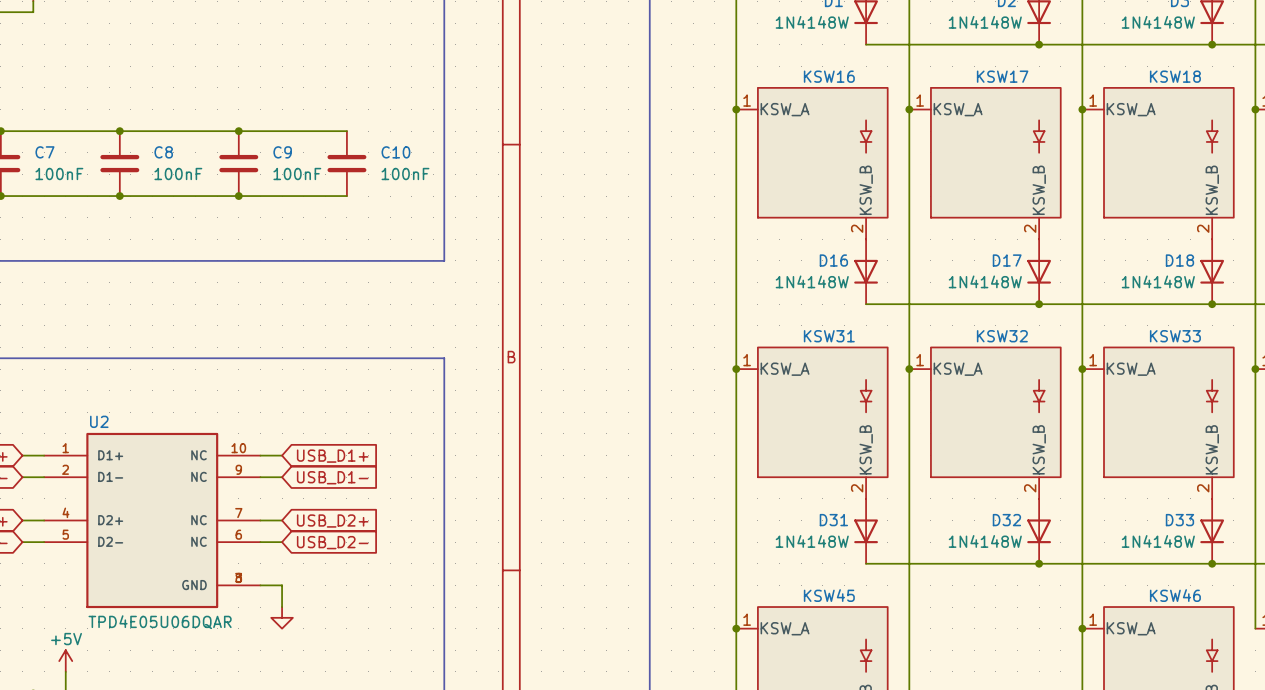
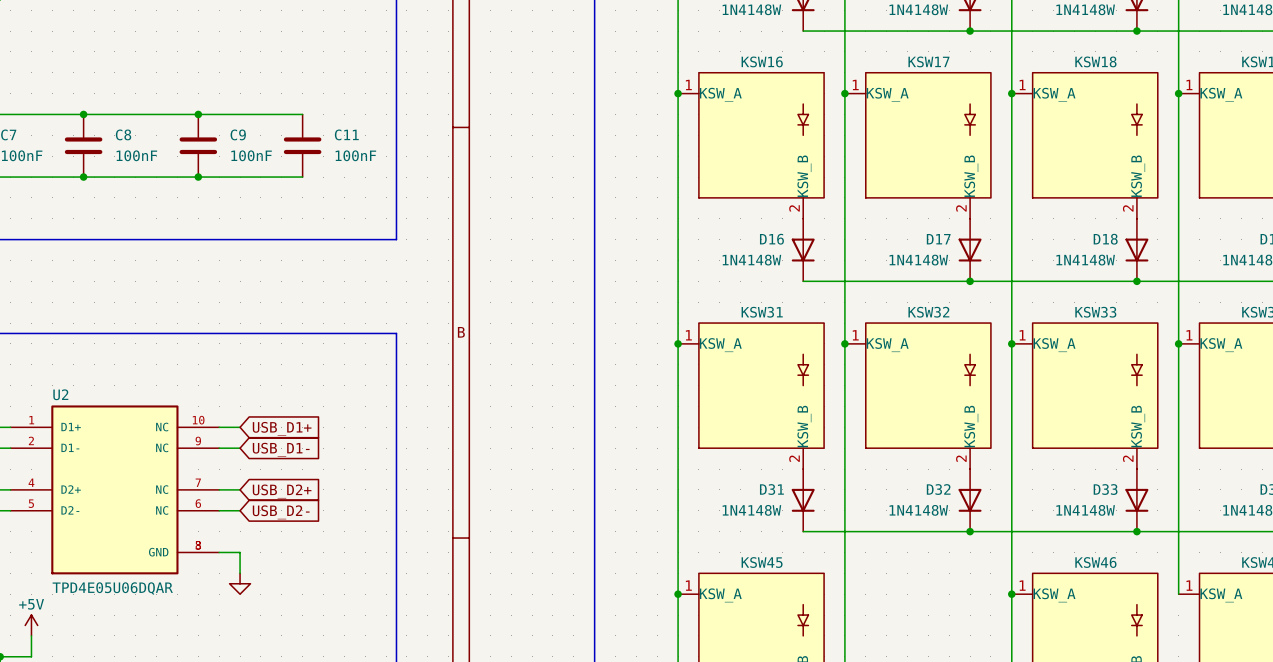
C10 name: C10 (395, 152) -> C11 (346, 134)

